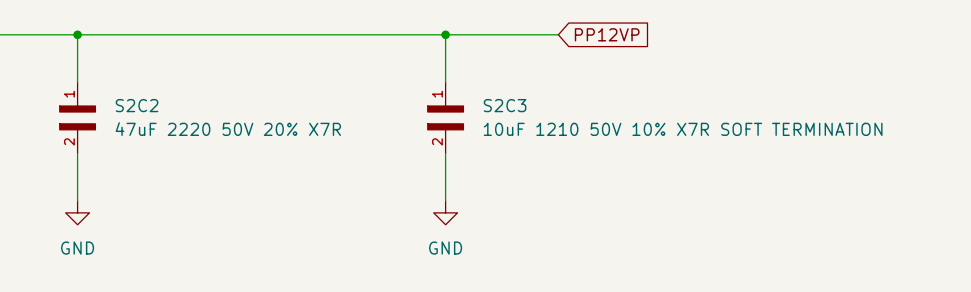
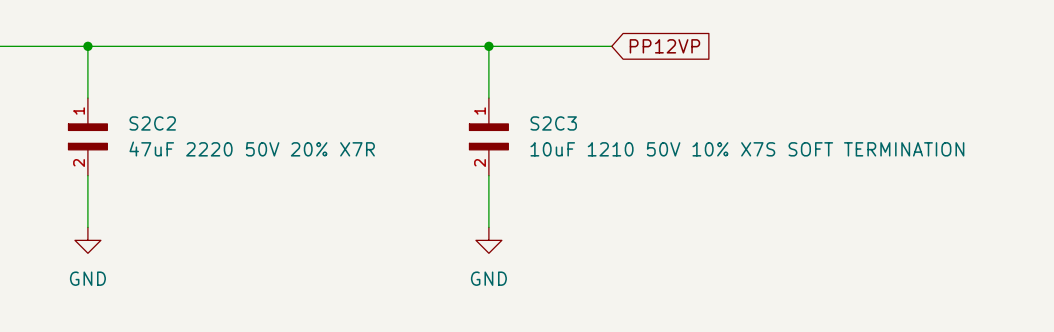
S2C3 value: 10uF 1210 50V 10% X7R SOFT TERMINATION (683, 129) -> 10uF 1210 50V 10% X7S SOFT TERMINATION (747, 149)

